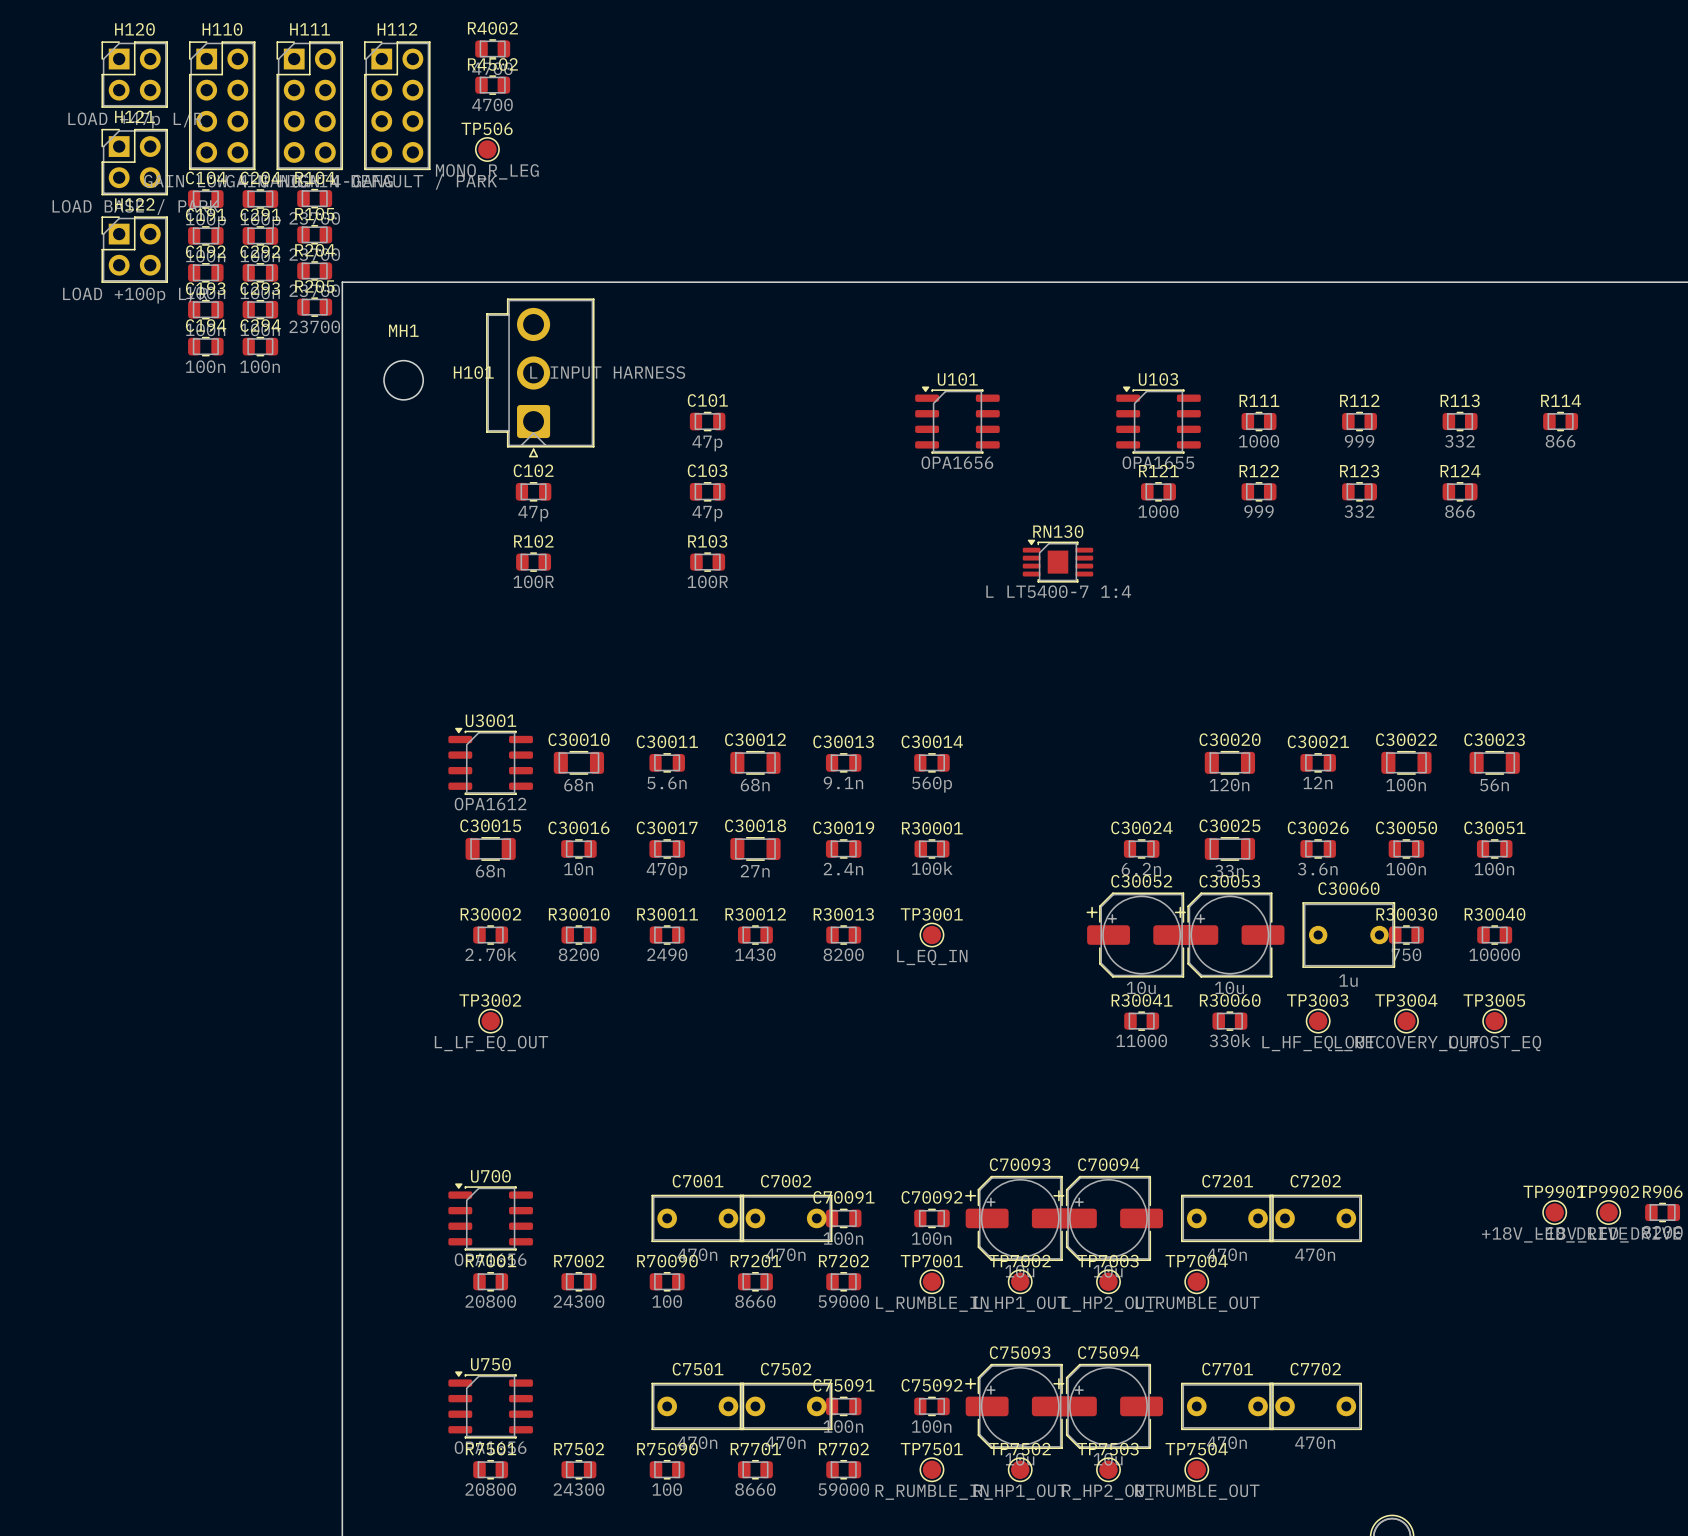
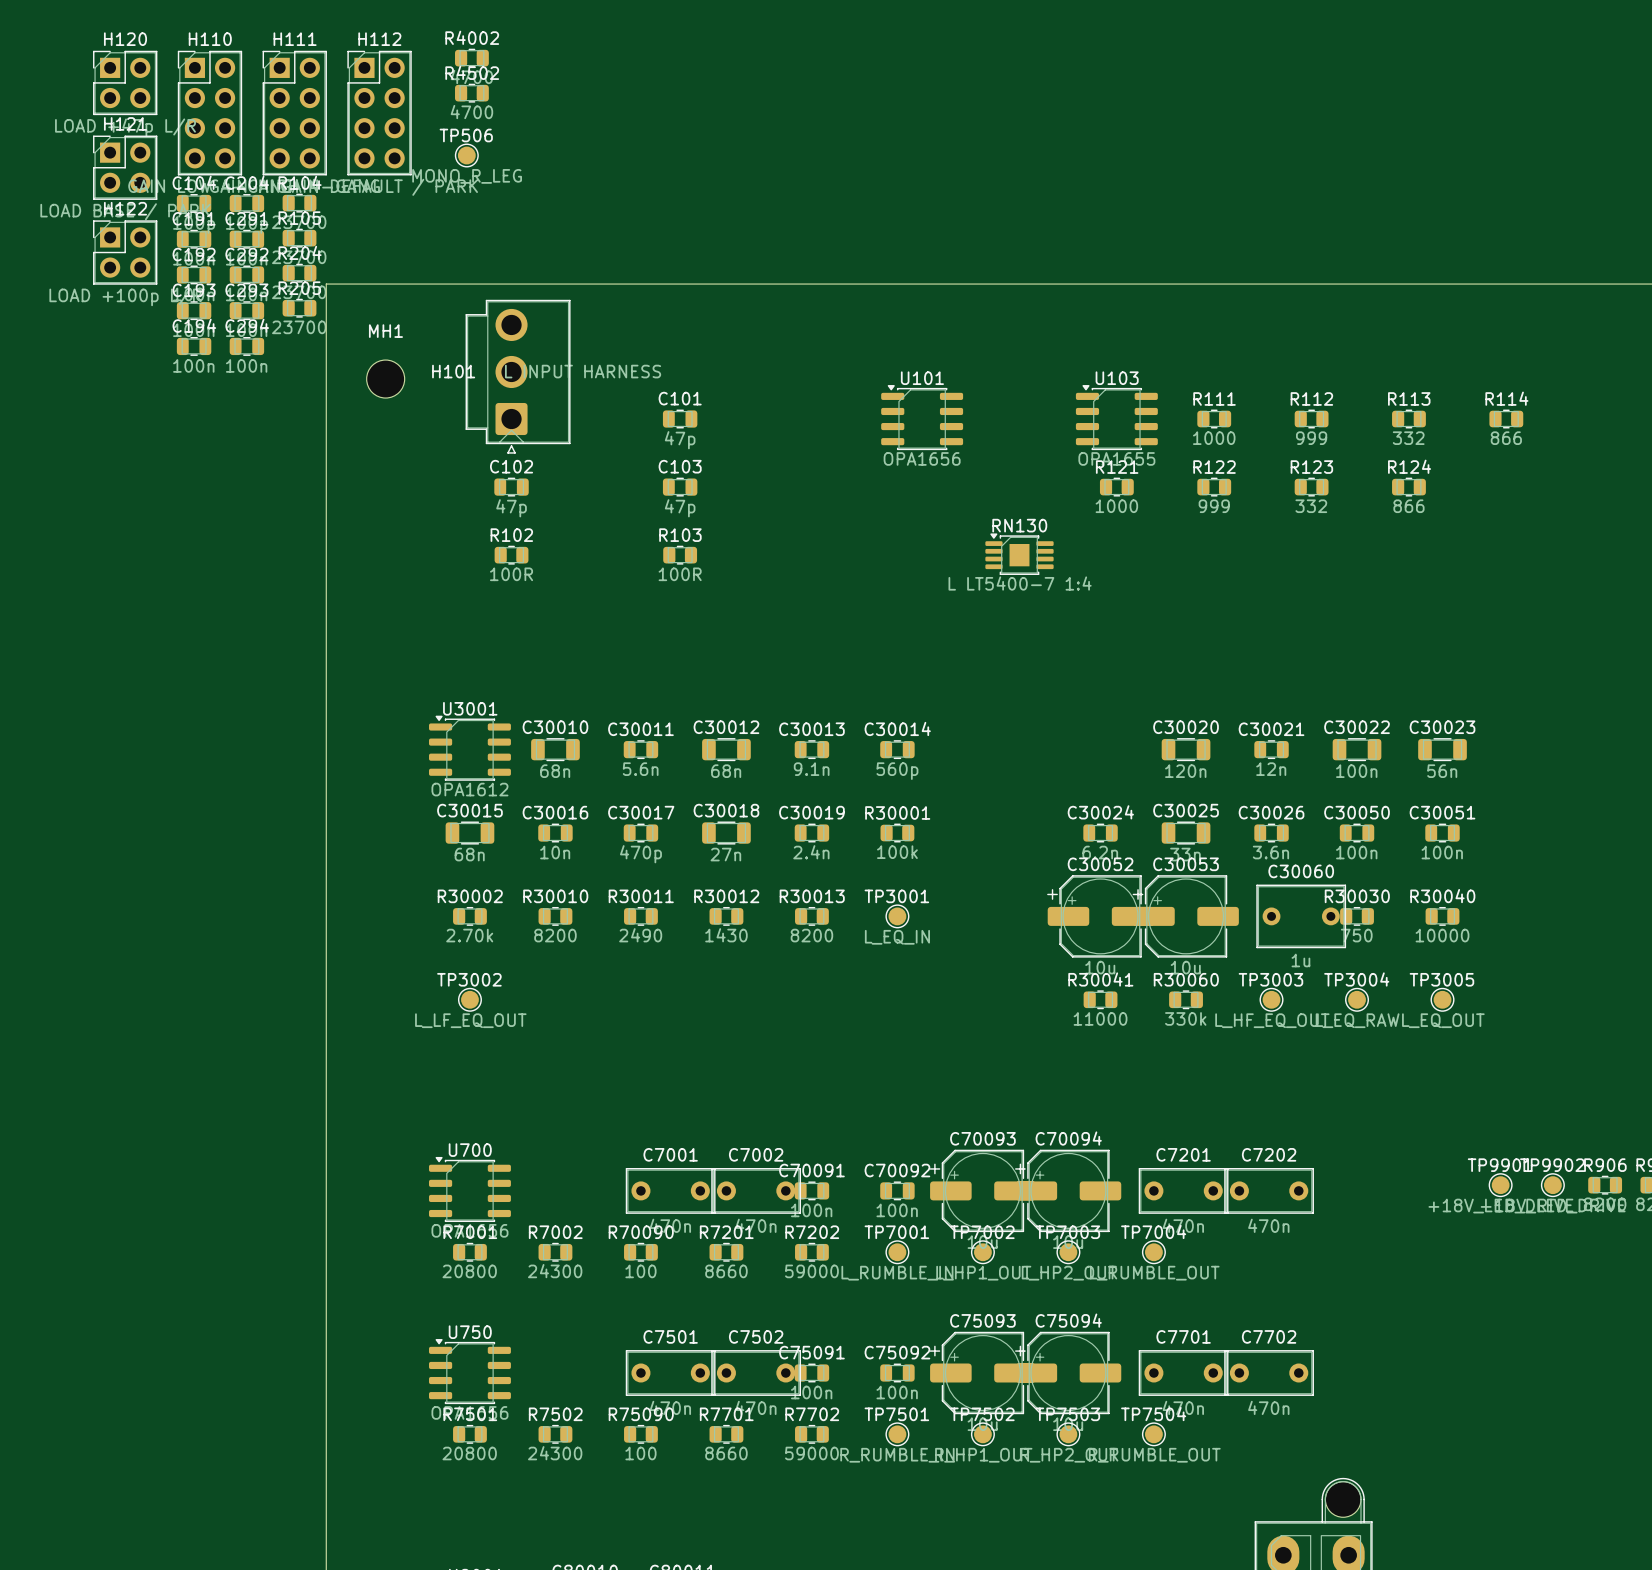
TP3004 value: L_RECOVERY_OUT (1407, 1043) -> L_EQ_RAW (1357, 1020)
TP3005 value: L_POST_EQ (1495, 1043) -> L_EQ_OUT (1443, 1020)

